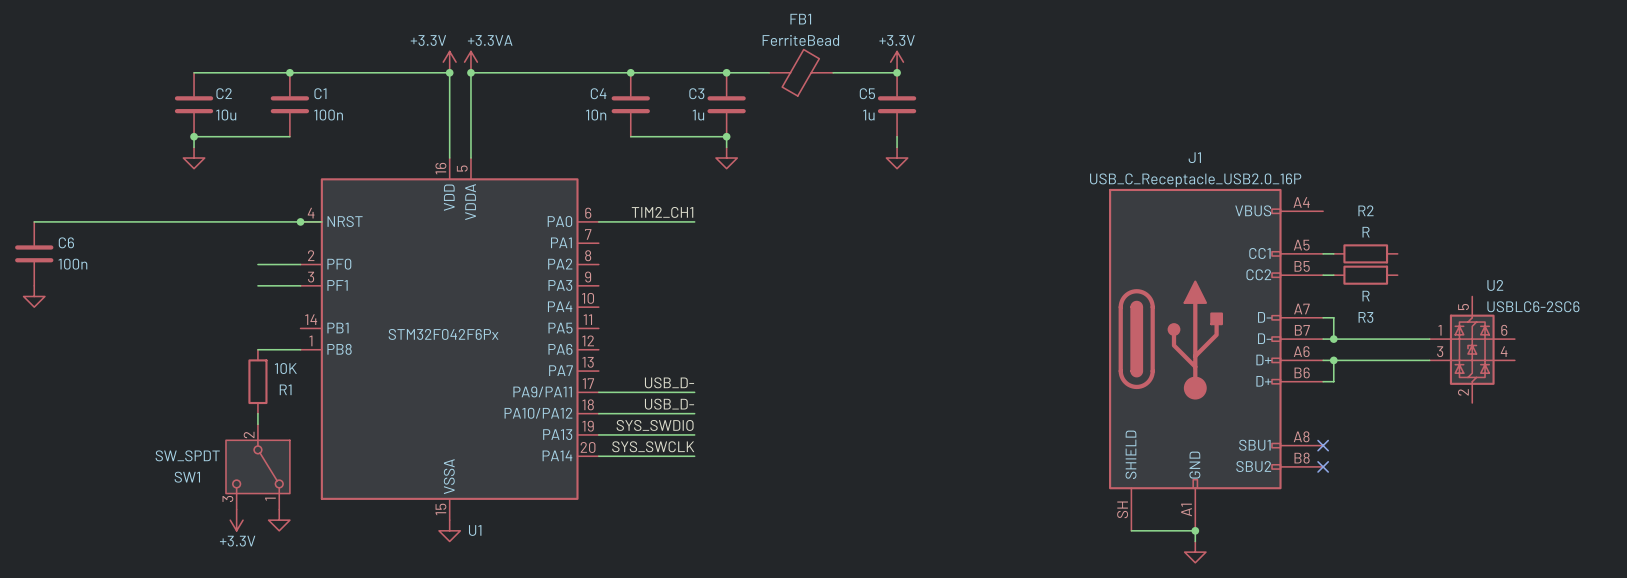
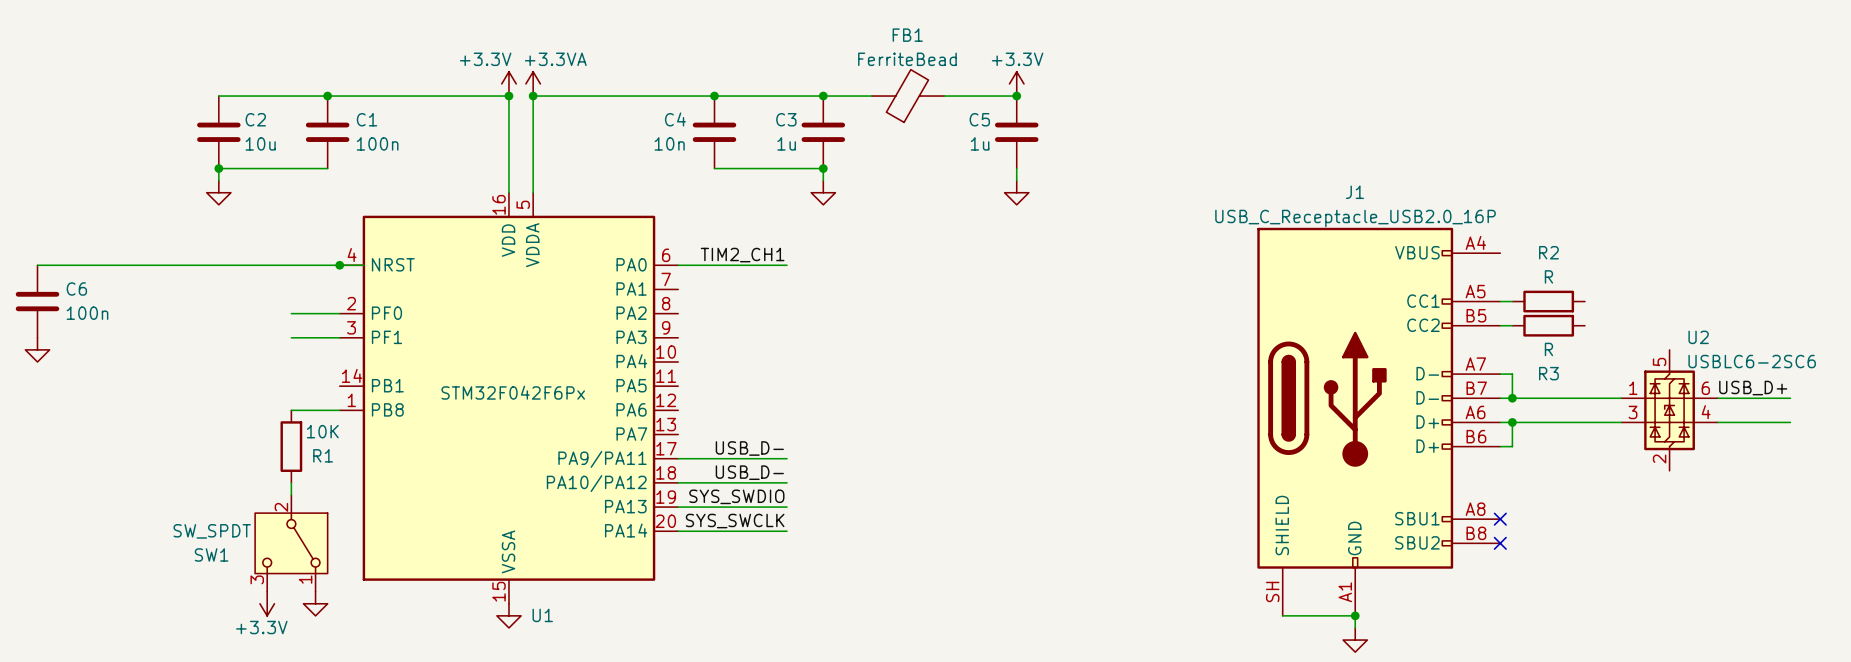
label: none -> USB_D+ (1753, 388)
wire: none -> (1717, 398) (1790, 398)
wire: none -> (1717, 422) (1790, 422)

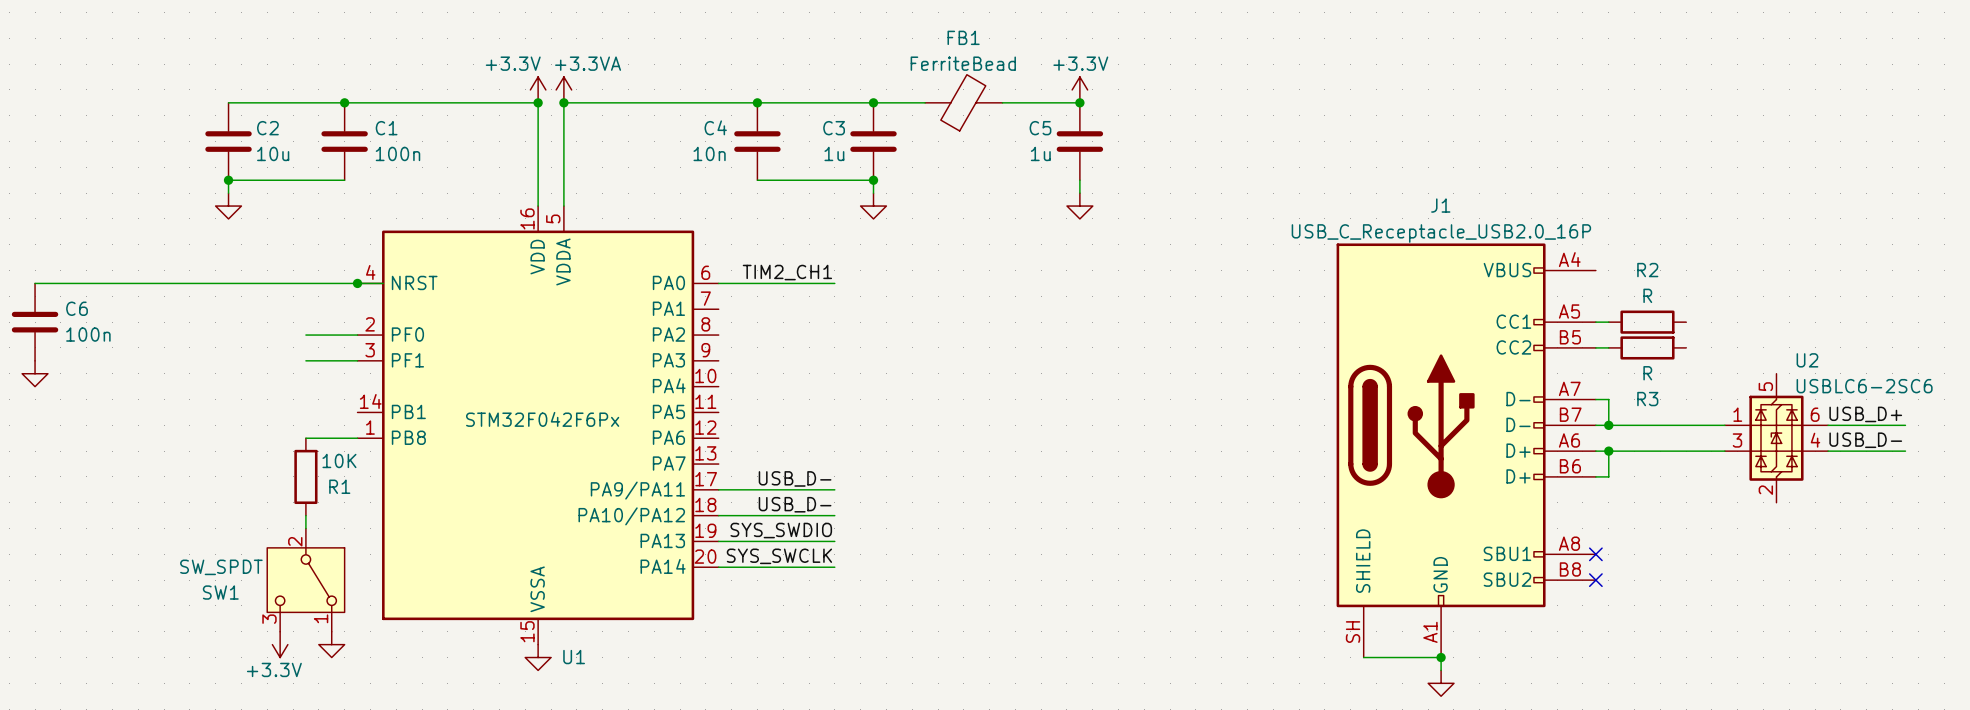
label: none -> USB_D- (1865, 440)

